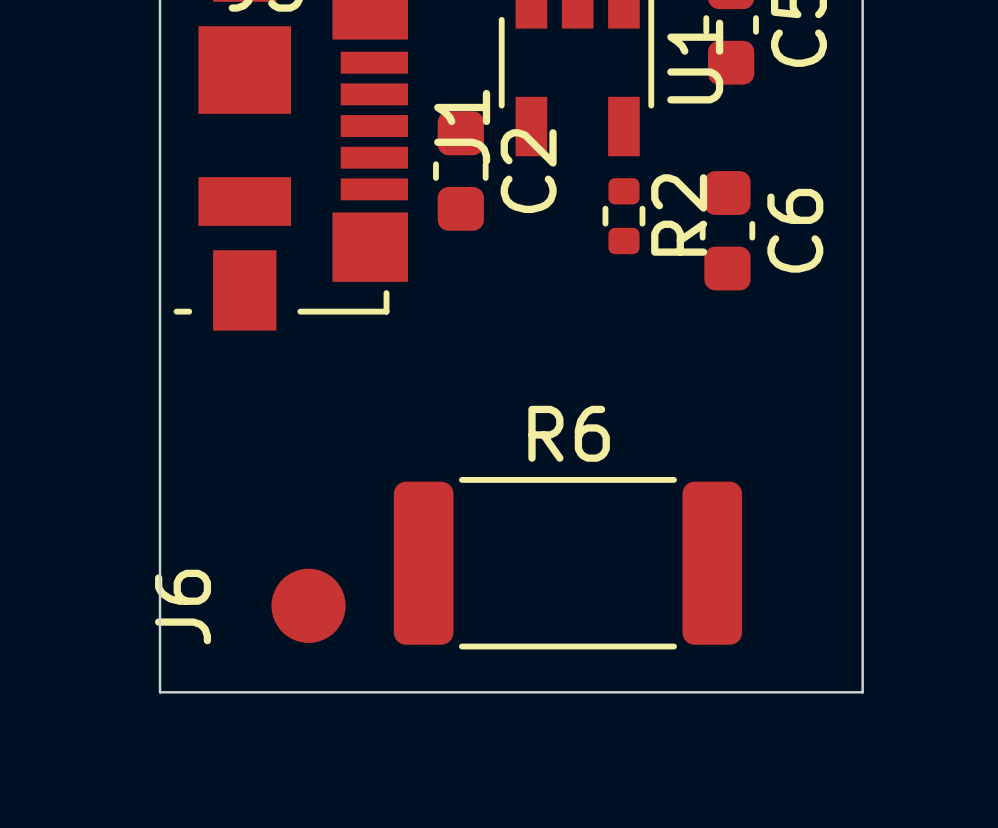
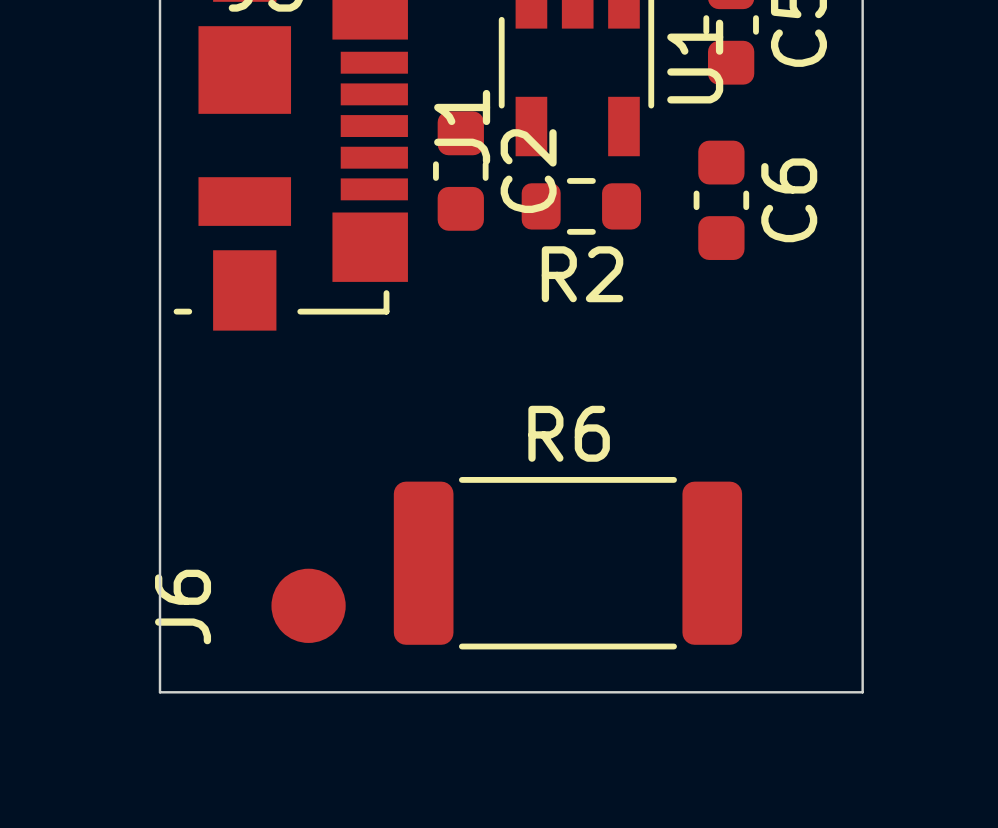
R2 footprint: [602, 178, 646, 255] -> [521, 178, 642, 235]
C6 position: (727, 230) -> (721, 200)

